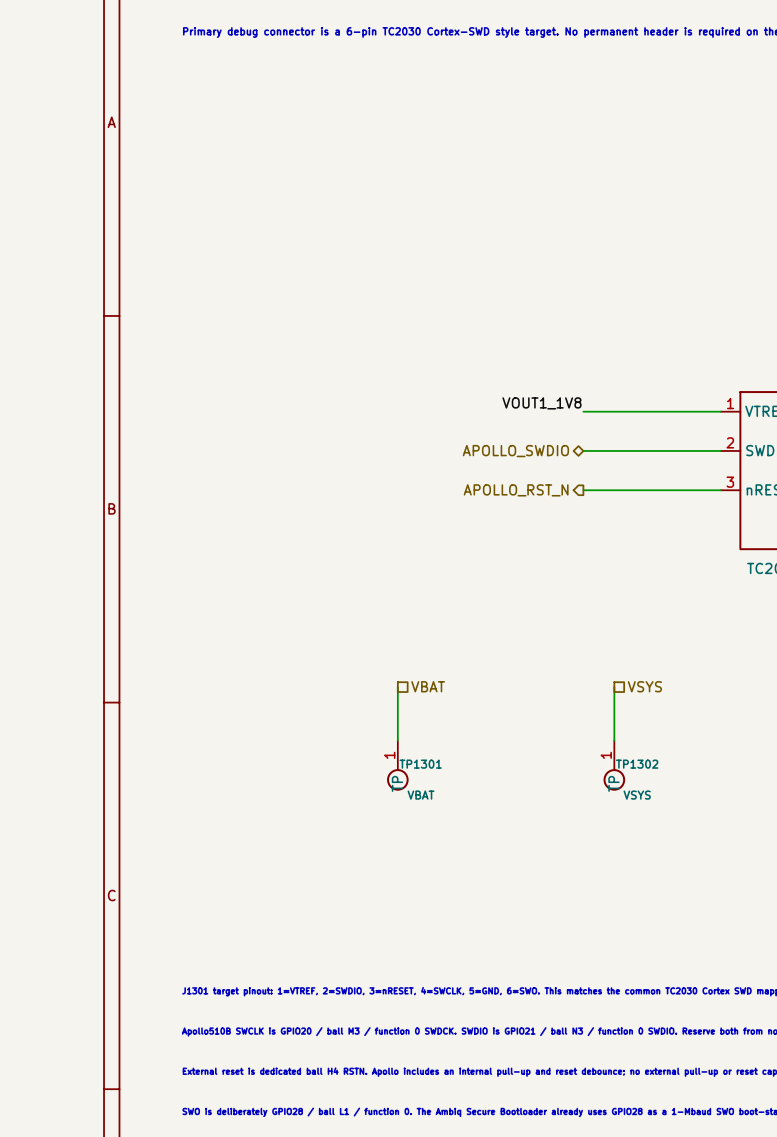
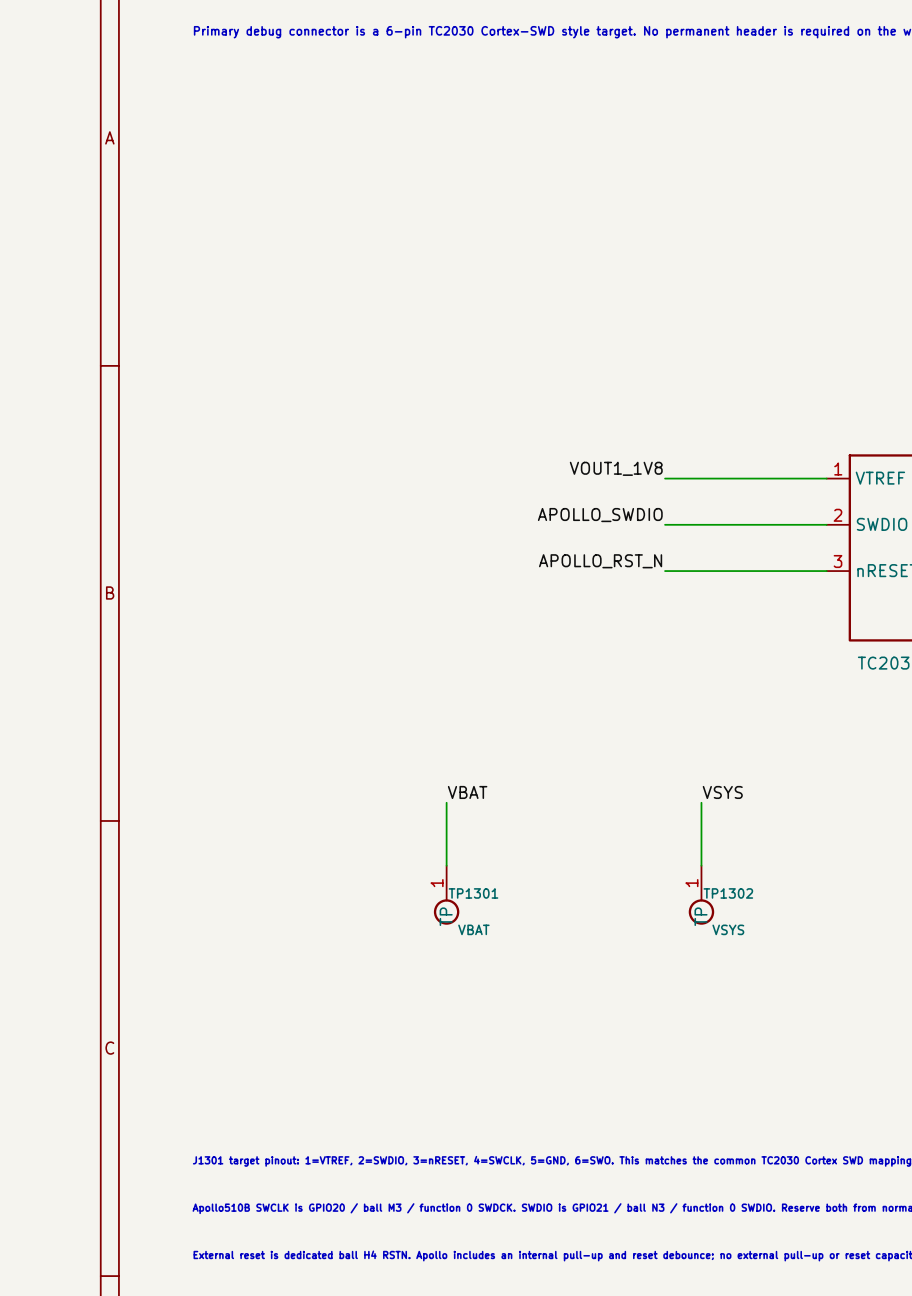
label: none -> APOLLO_SWDIO (600, 515)
hierarchical label: APOLLO_SWDIO (515, 451) -> none
label: none -> APOLLO_RST_N (600, 561)
hierarchical label: APOLLO_RST_N (516, 490) -> none
label: none -> VBAT (467, 792)
label: none -> VSYS (722, 792)
hierarchical label: VBAT (428, 686) -> none
hierarchical label: VSYS (644, 686) -> none

